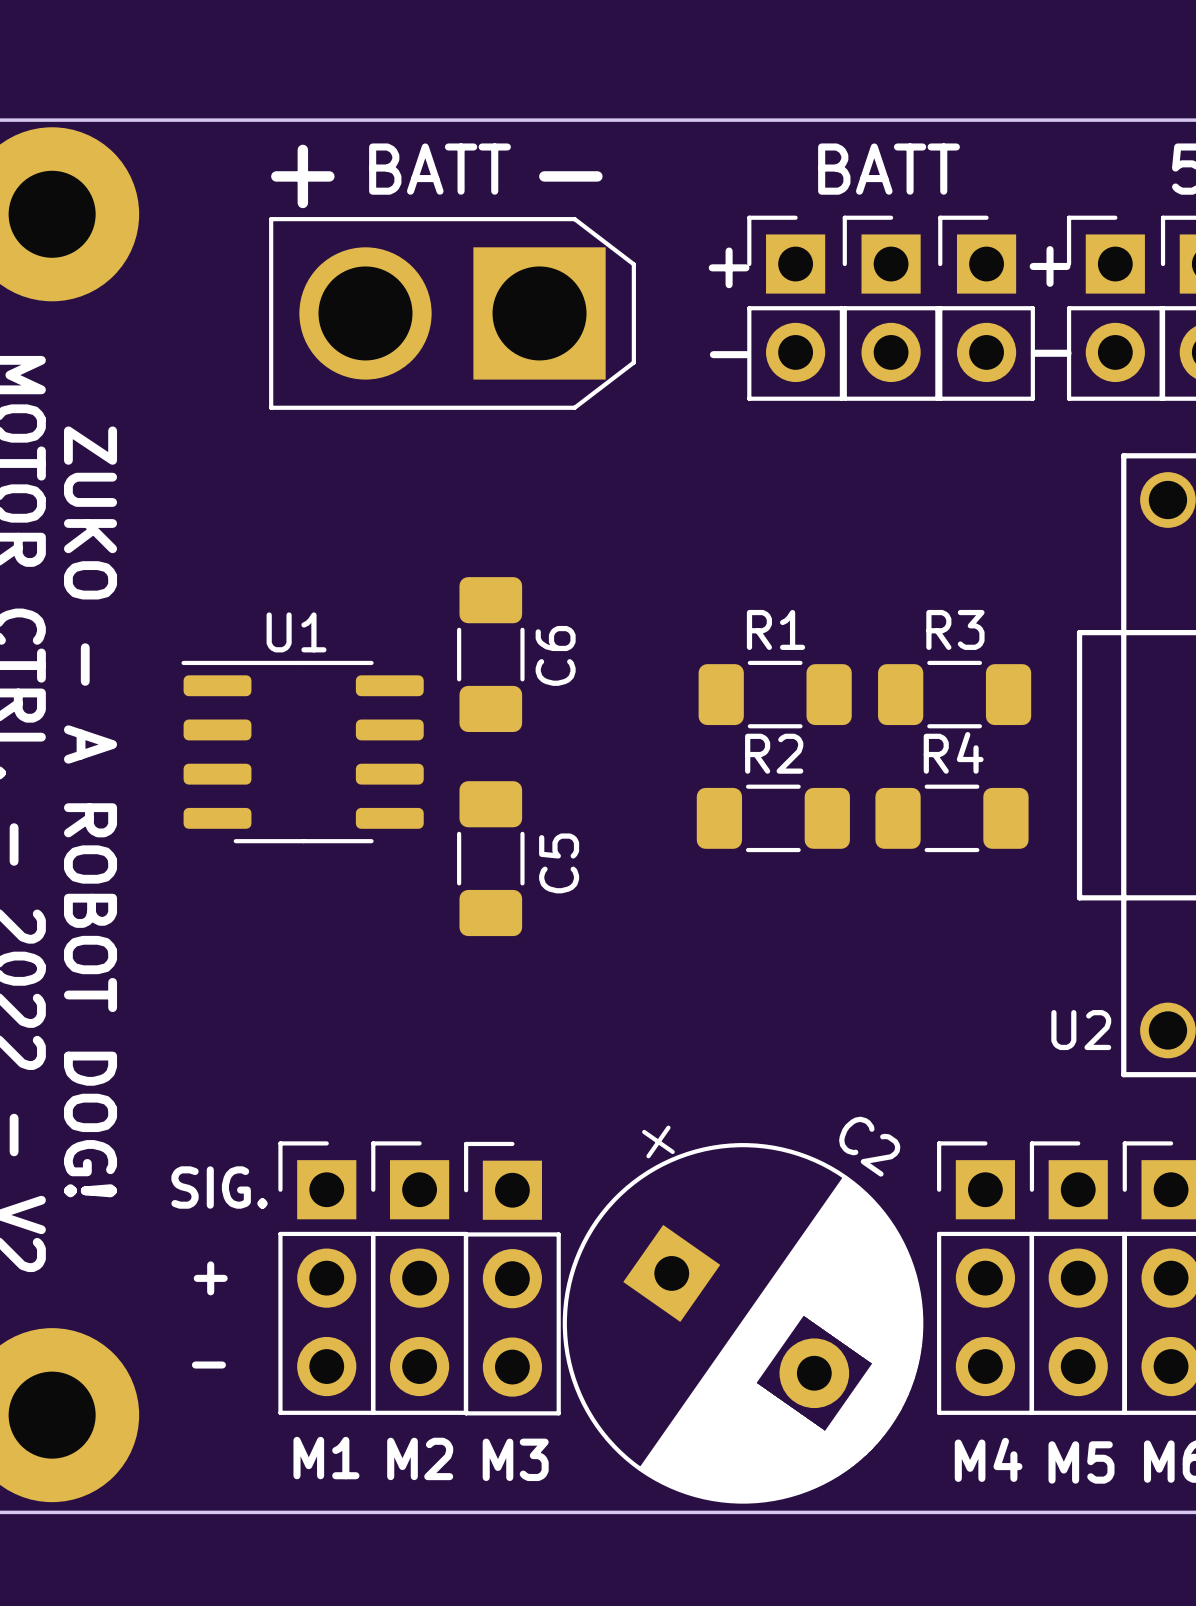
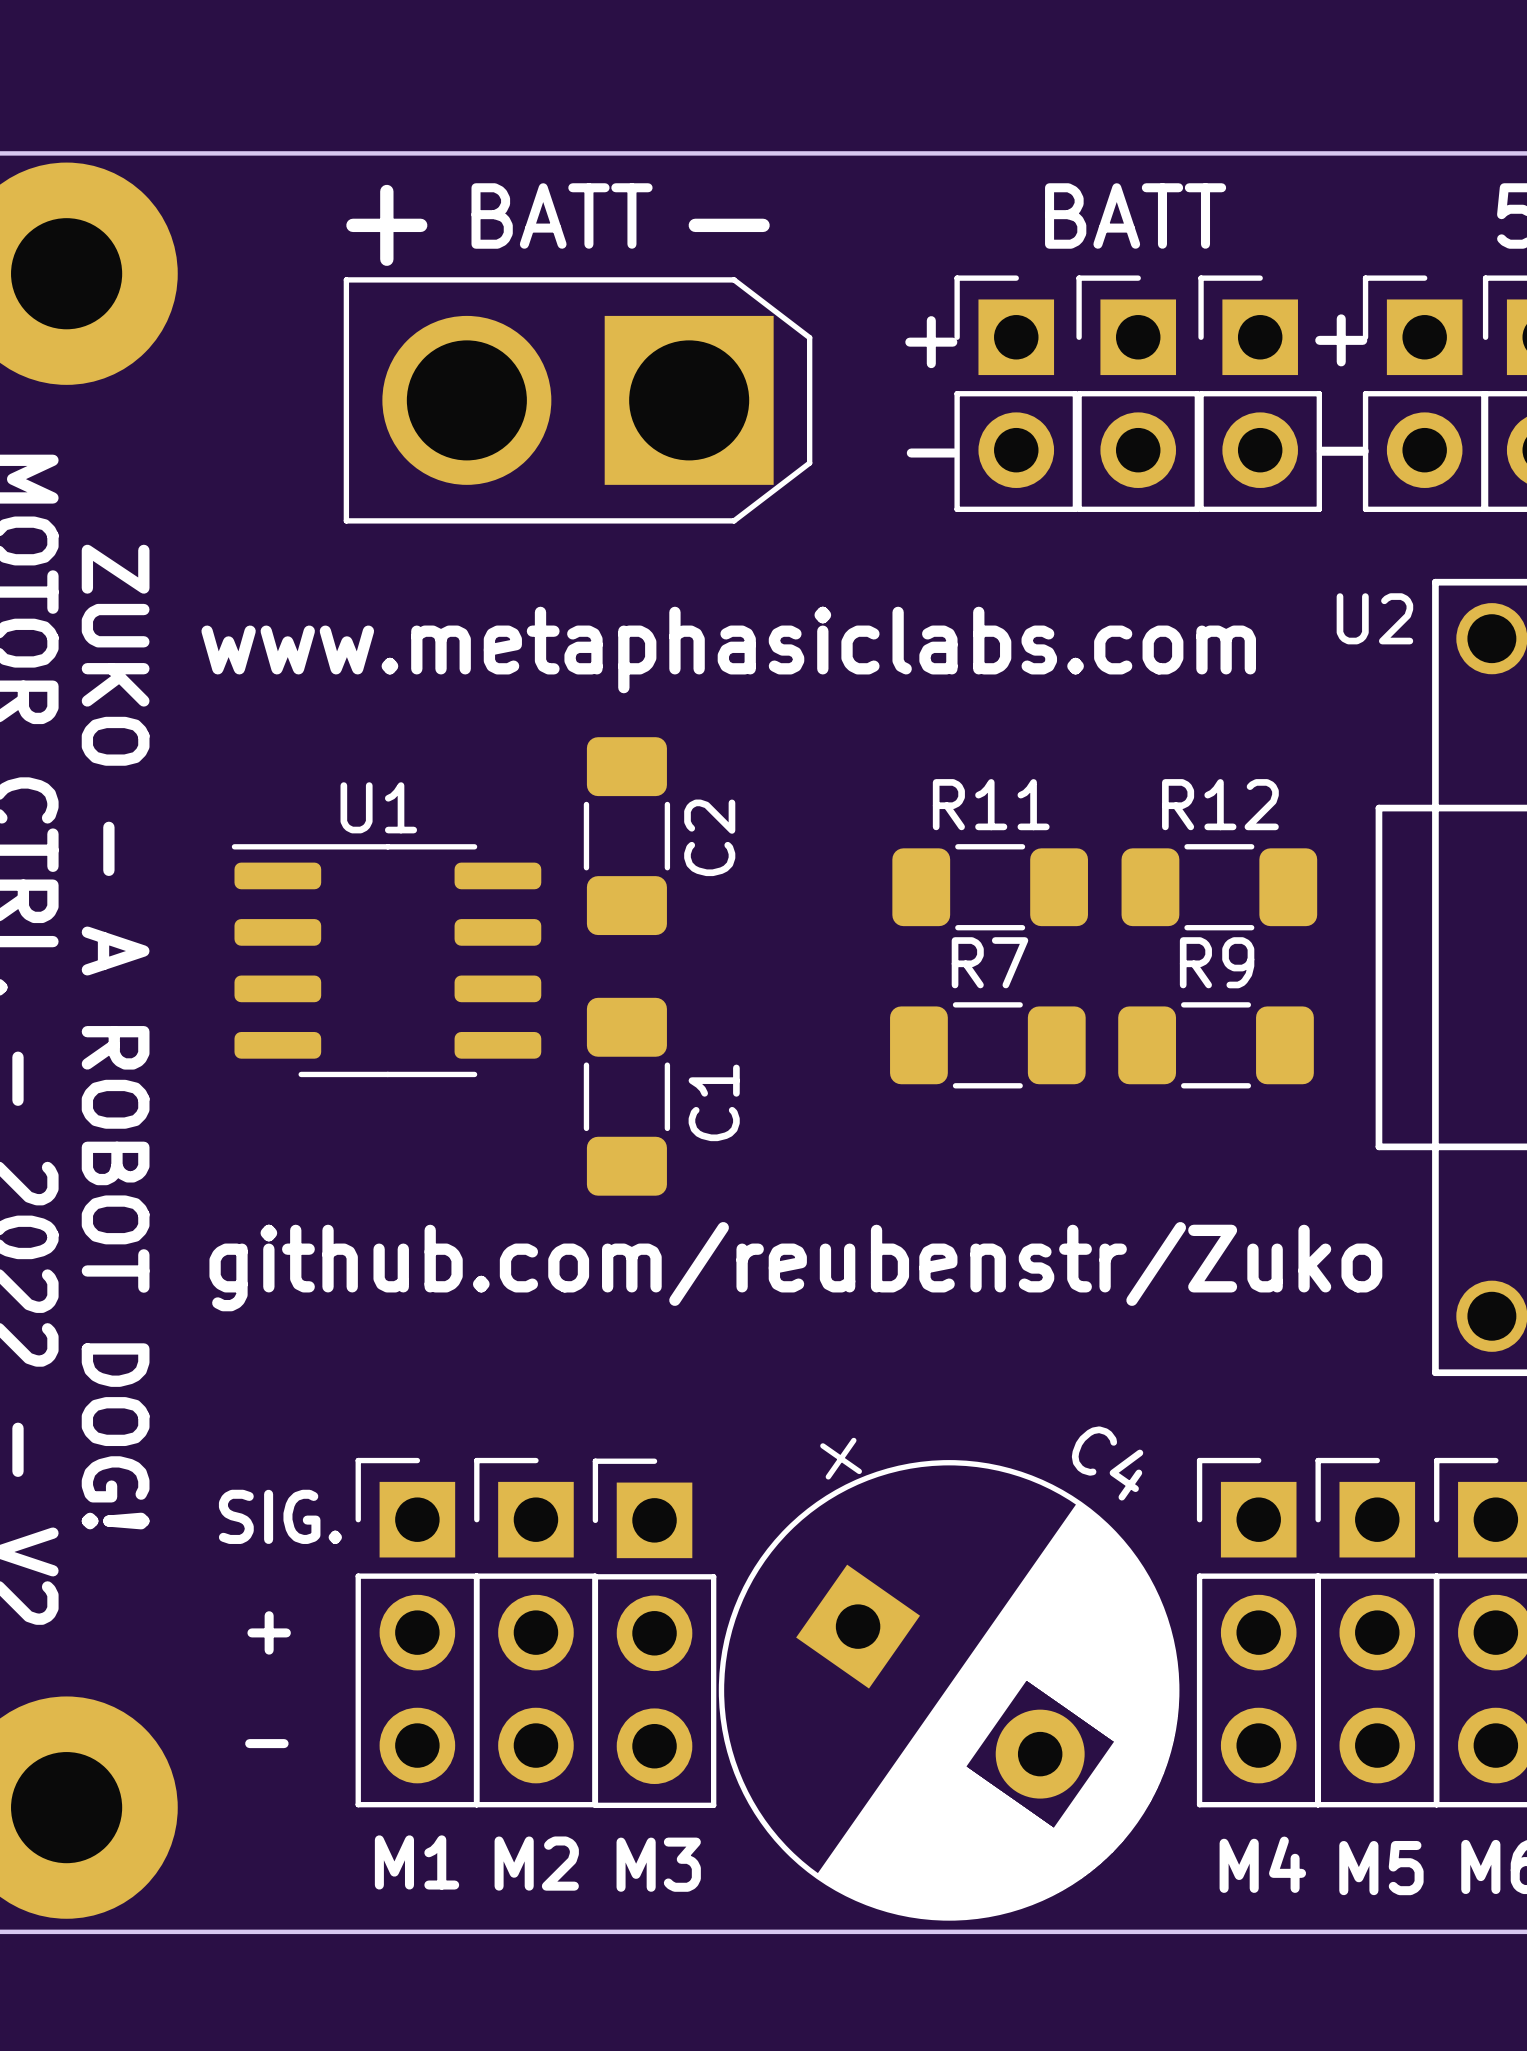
text: none -> www.metaphasiclabs.com (728, 650)
R1 name: R1 (776, 629) -> R11 (991, 804)
R3 name: R3 (955, 629) -> R12 (1220, 804)
C6 name: C6 (555, 655) -> C2 (709, 837)
R4 name: R4 (953, 752) -> R9 (1217, 962)
R2 name: R2 (774, 753) -> R7 (989, 962)
C5 name: C5 (559, 863) -> C1 (714, 1102)
text: none -> github.com/reubenstr/Zuko (795, 1266)
U2 name position: U2 (1081, 1030) -> U2 (1374, 618)
C2 name: C2 (869, 1146) -> C4 (1107, 1463)

